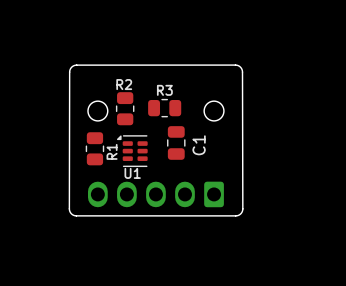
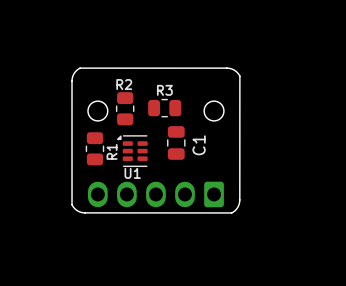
board edge: none -> (72, 204) (72, 81) (77, 69) (80, 68) (226, 68) (234, 70) (239, 76) (239, 201) (237, 207) (231, 212)
board edge: none -> (72, 204) (77, 210) (85, 212) (231, 212)
board edge: (69, 208) (69, 72) (72, 66) (235, 65) (240, 67) (242, 72) (242, 208) (240, 213) (235, 215) (76, 215) -> none
board edge: (69, 208) (71, 213) (76, 215) -> none

